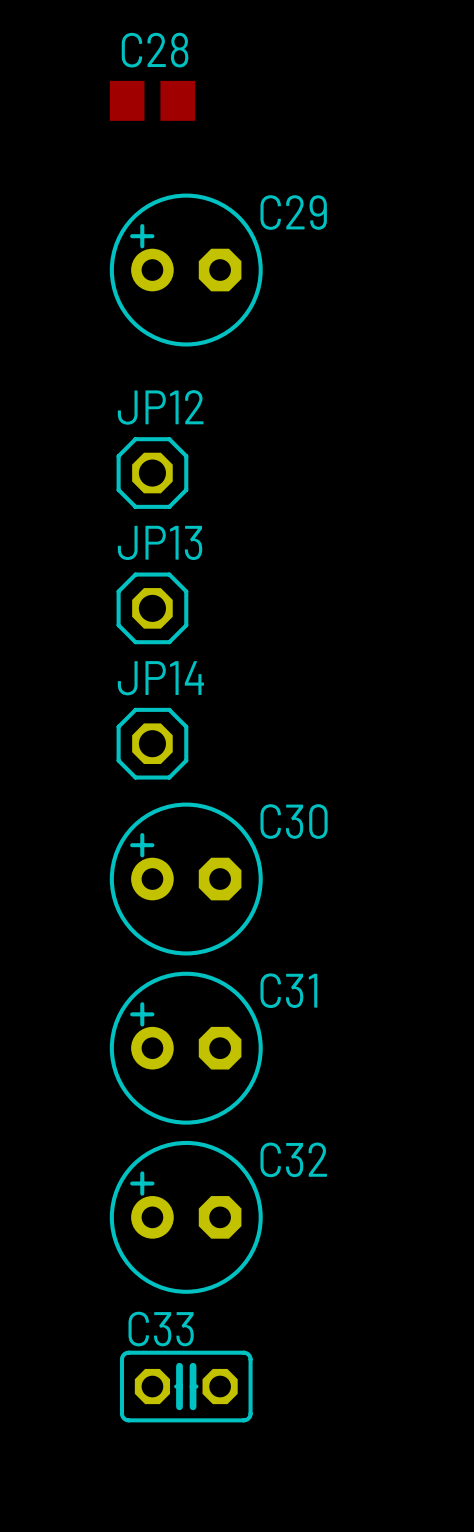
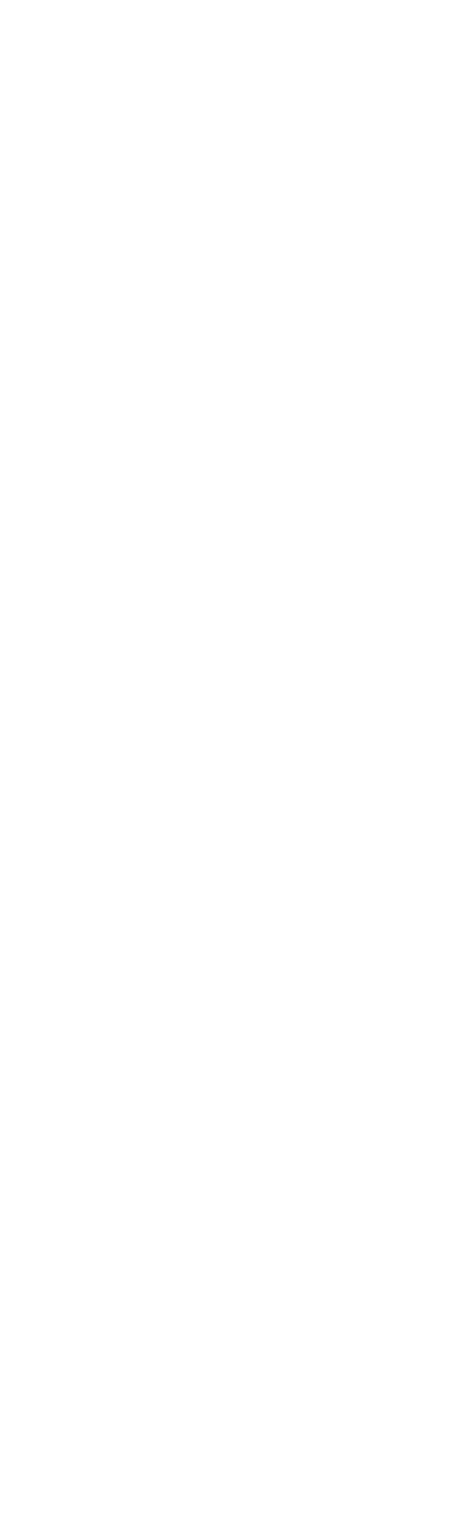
C28: (152, 100) -> none
C29: (186, 270) -> none
JP12: (152, 473) -> none
JP13: (152, 608) -> none
JP14: (152, 743) -> none
C30: (186, 879) -> none
C31: (186, 1048) -> none
C32: (186, 1217) -> none
C33: (186, 1386) -> none

